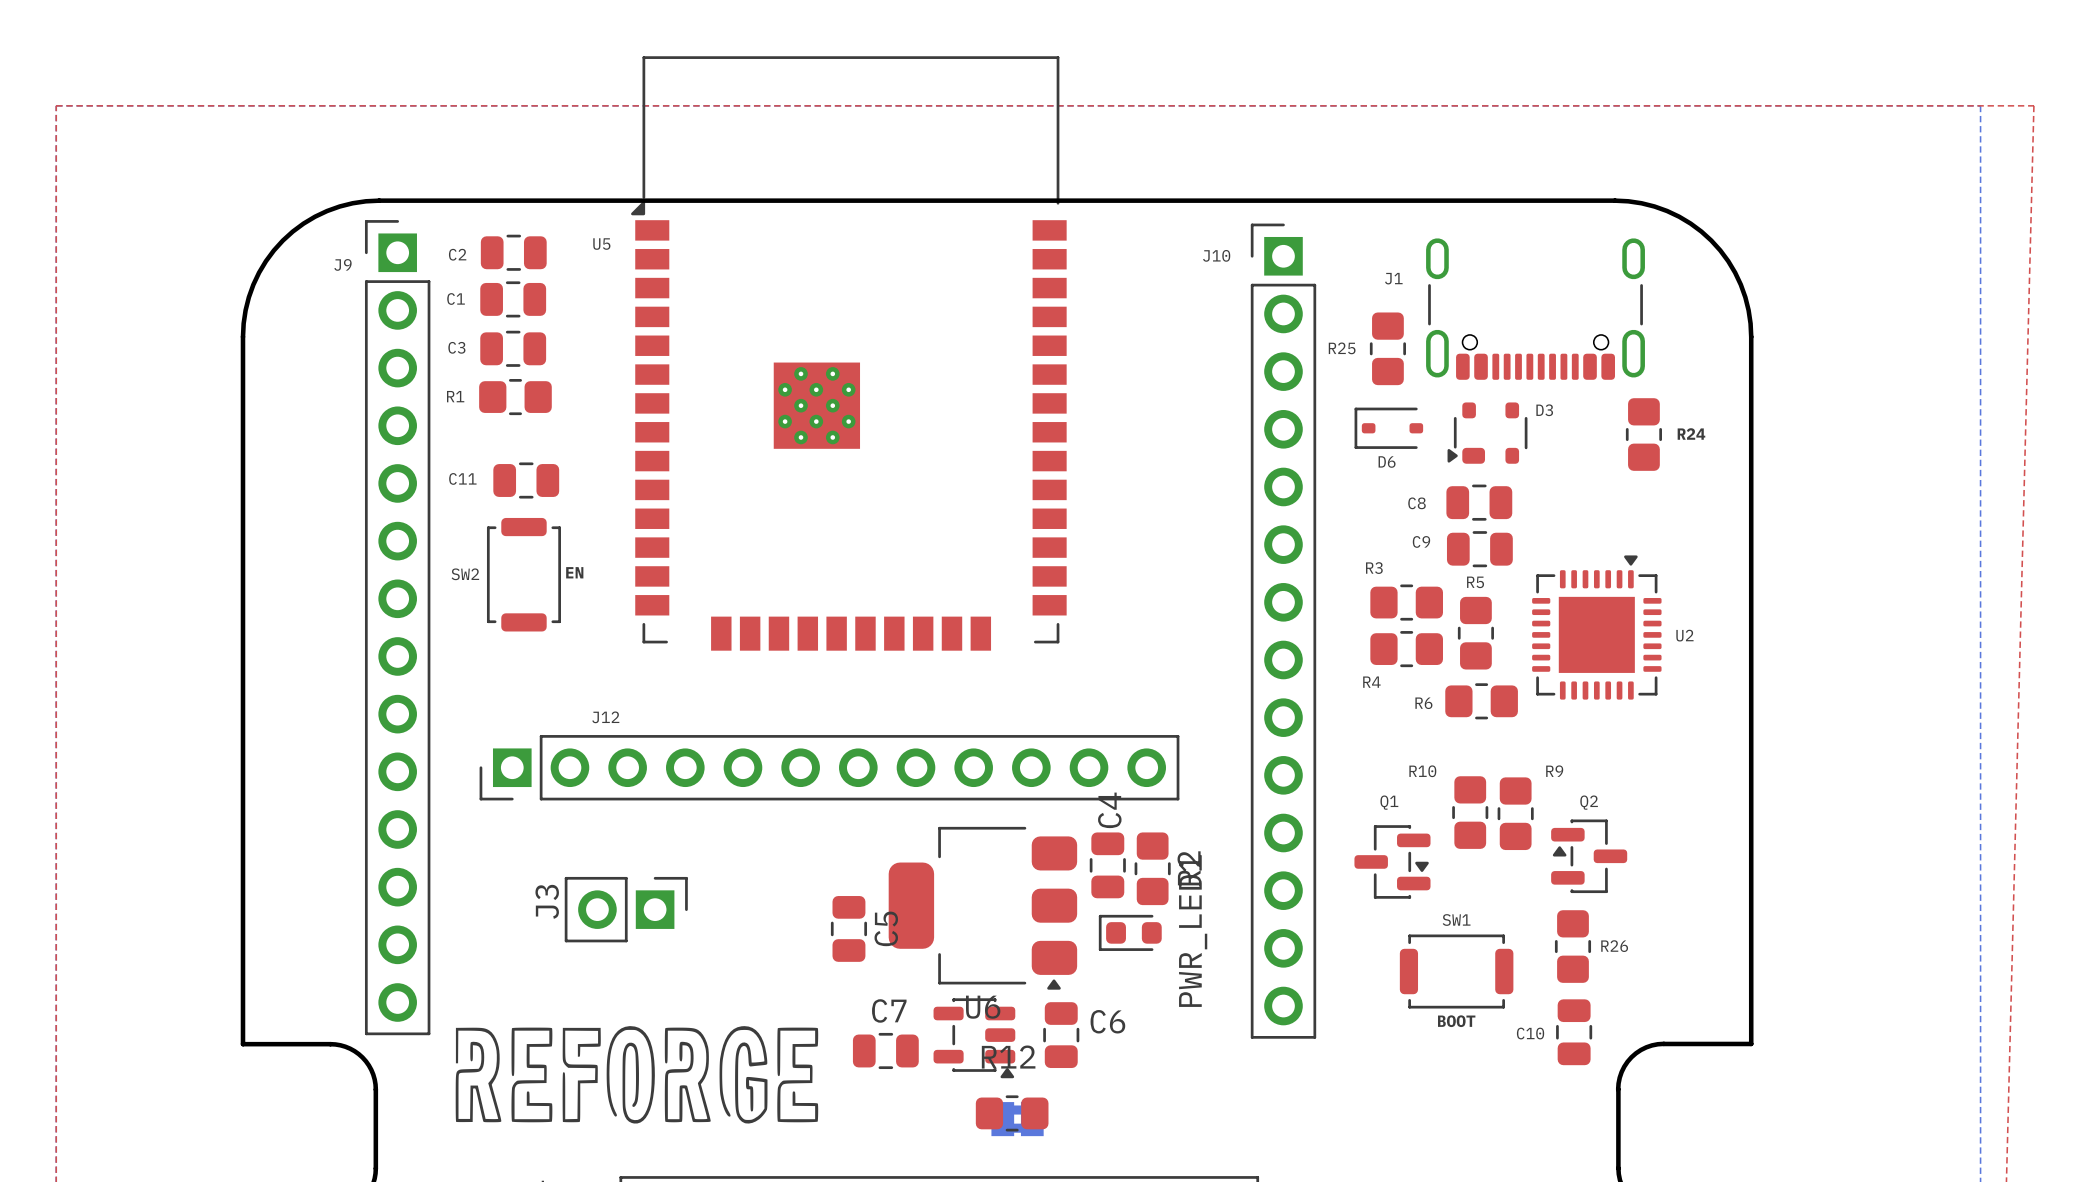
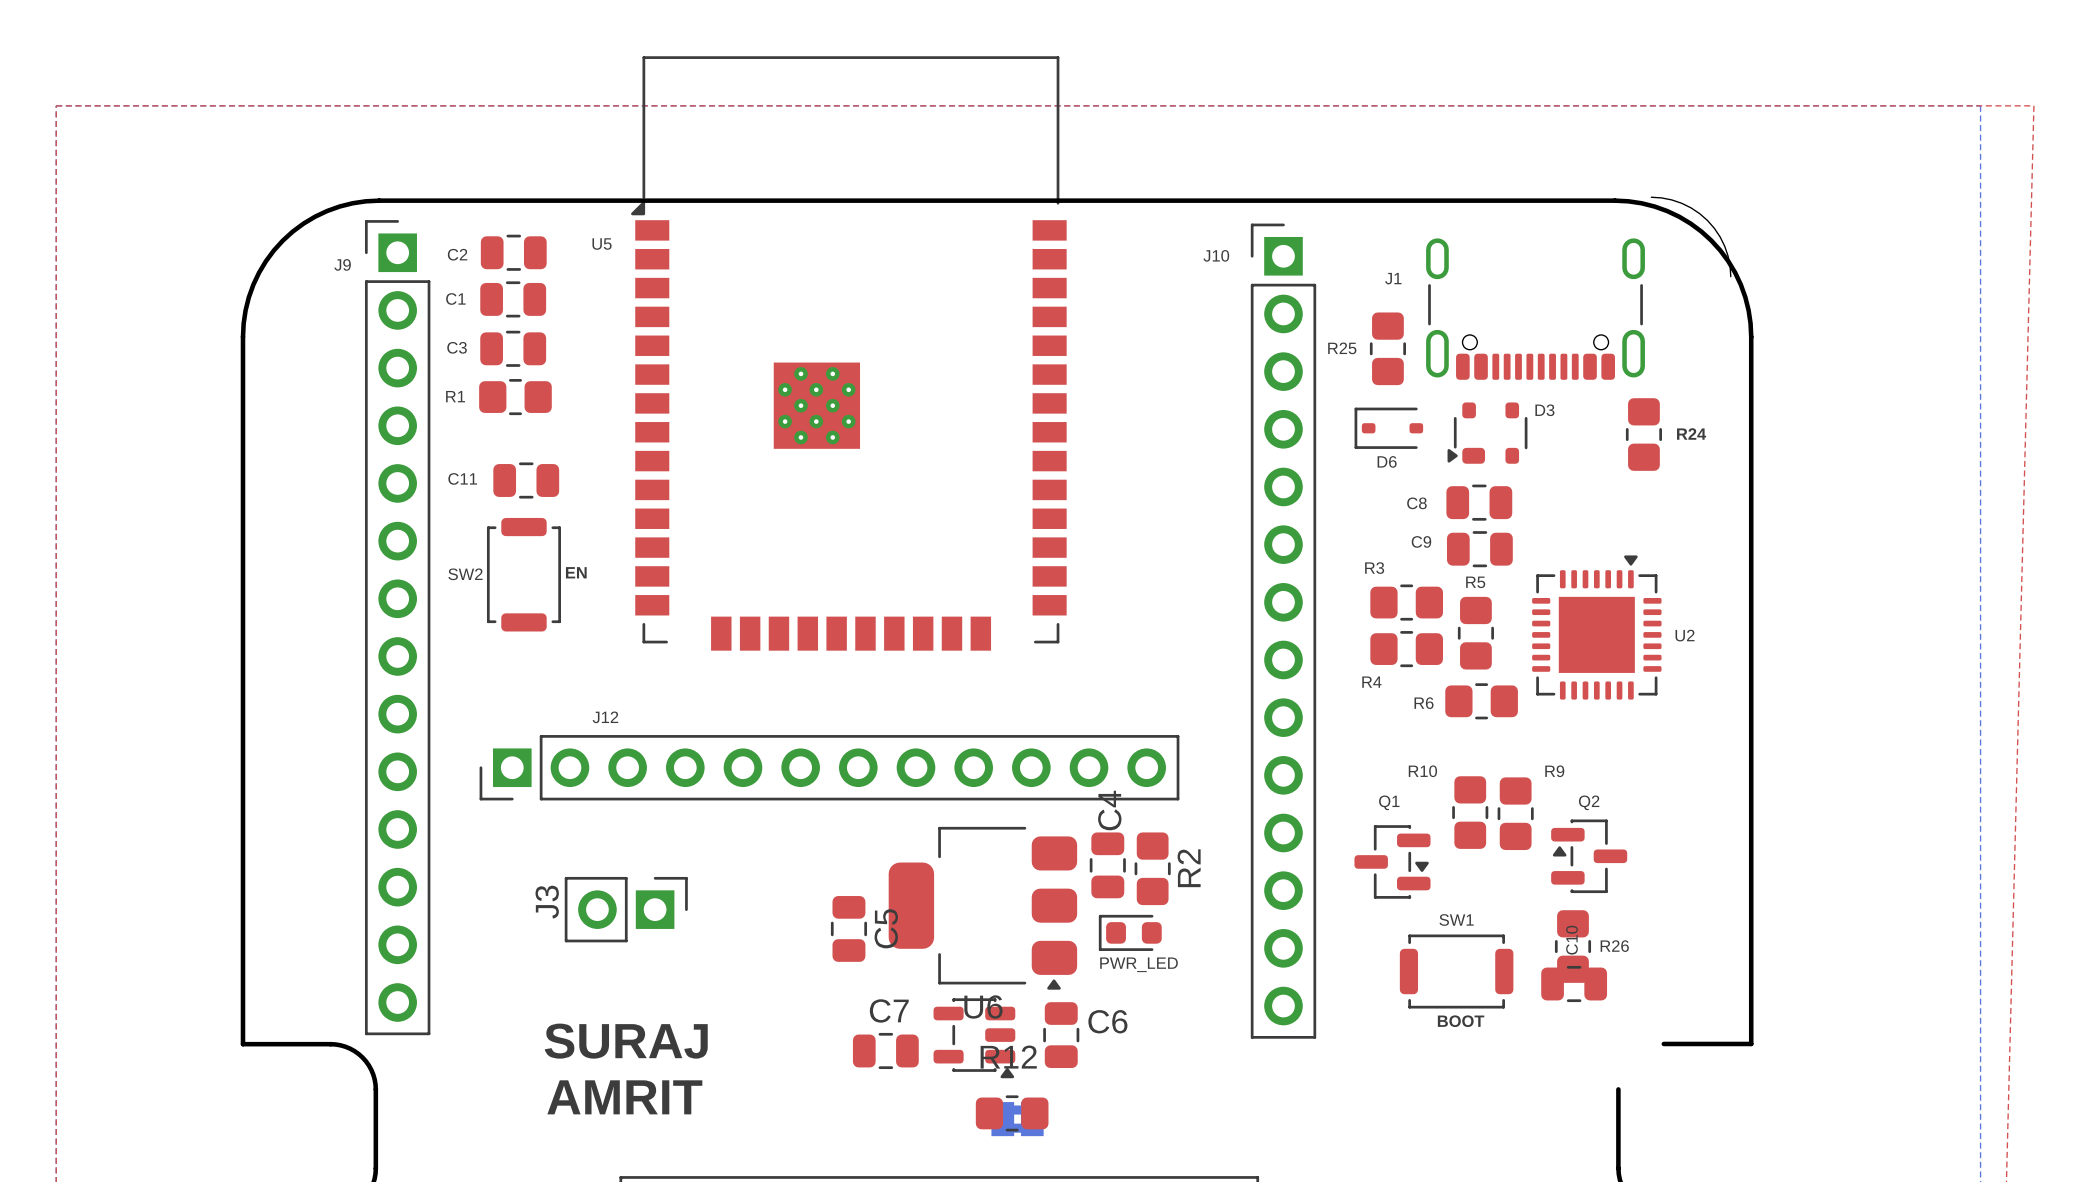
board edge: none -> (1651, 197) (1681, 203) (1707, 220) (1724, 246) (1730, 276)
PWR_LED1 name: PWR_LED1 (1193, 931) -> PWR_LED (1139, 964)
drawing: [455, 1026, 819, 1124] -> none
C10 rotation: 0° (1574, 1032) -> 90° clockwise (1574, 984)
C10 position: (1574, 1032) -> (1574, 984)
text: none -> SURAJ (626, 1041)
board edge: (1663, 1043) (1646, 1047) (1631, 1057) (1621, 1072) (1618, 1089) -> none
text: none -> AMRIT (624, 1097)

